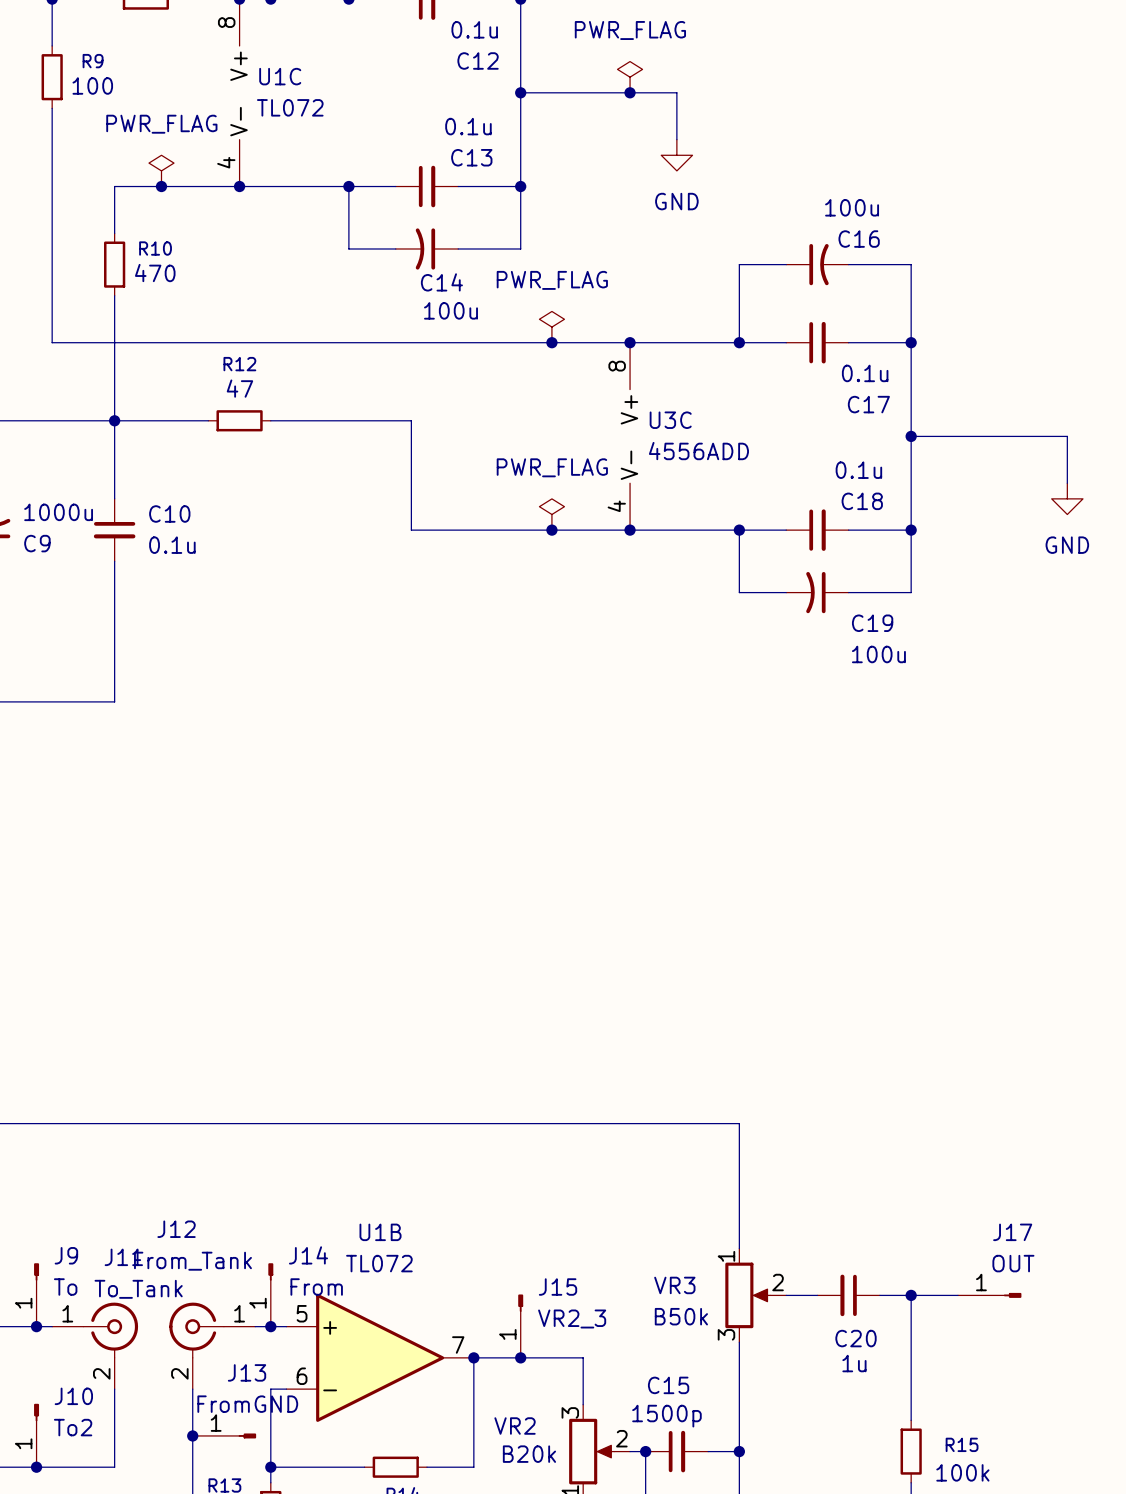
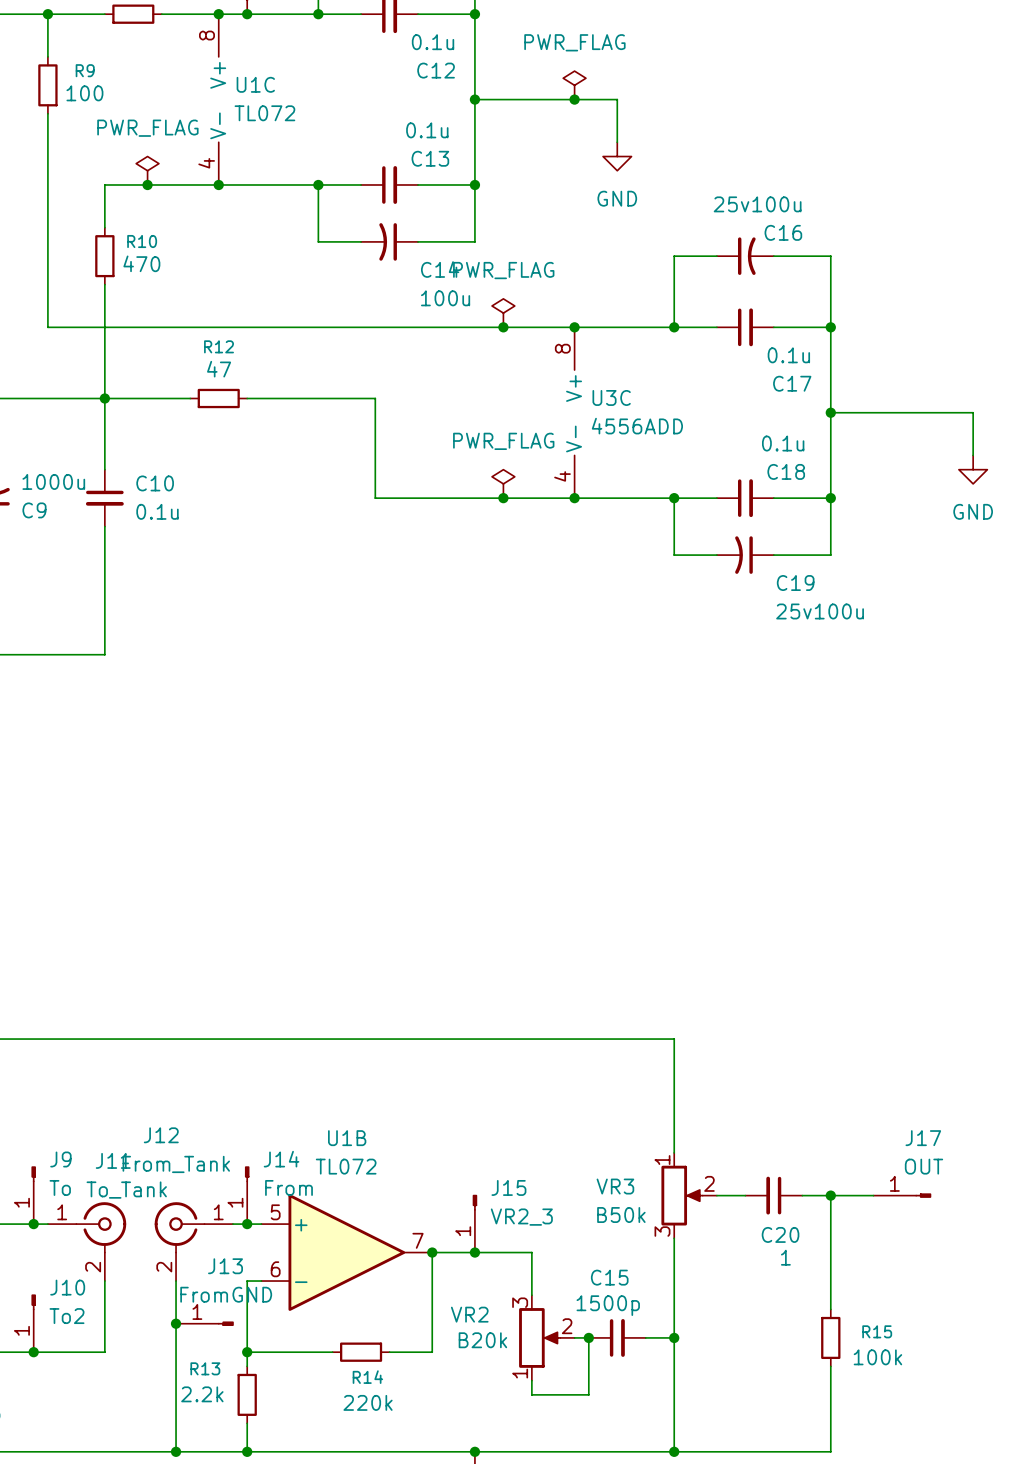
C16 value: 100u (852, 207) -> 25v100u (757, 204)
C14 name position: C14 (441, 282) -> C14 (440, 269)
C14 value position: 100u (450, 310) -> 100u (445, 298)
C19 value: 100u (878, 654) -> 25v100u (820, 611)
C20 value: 1u (854, 1363) -> 1 (785, 1257)

